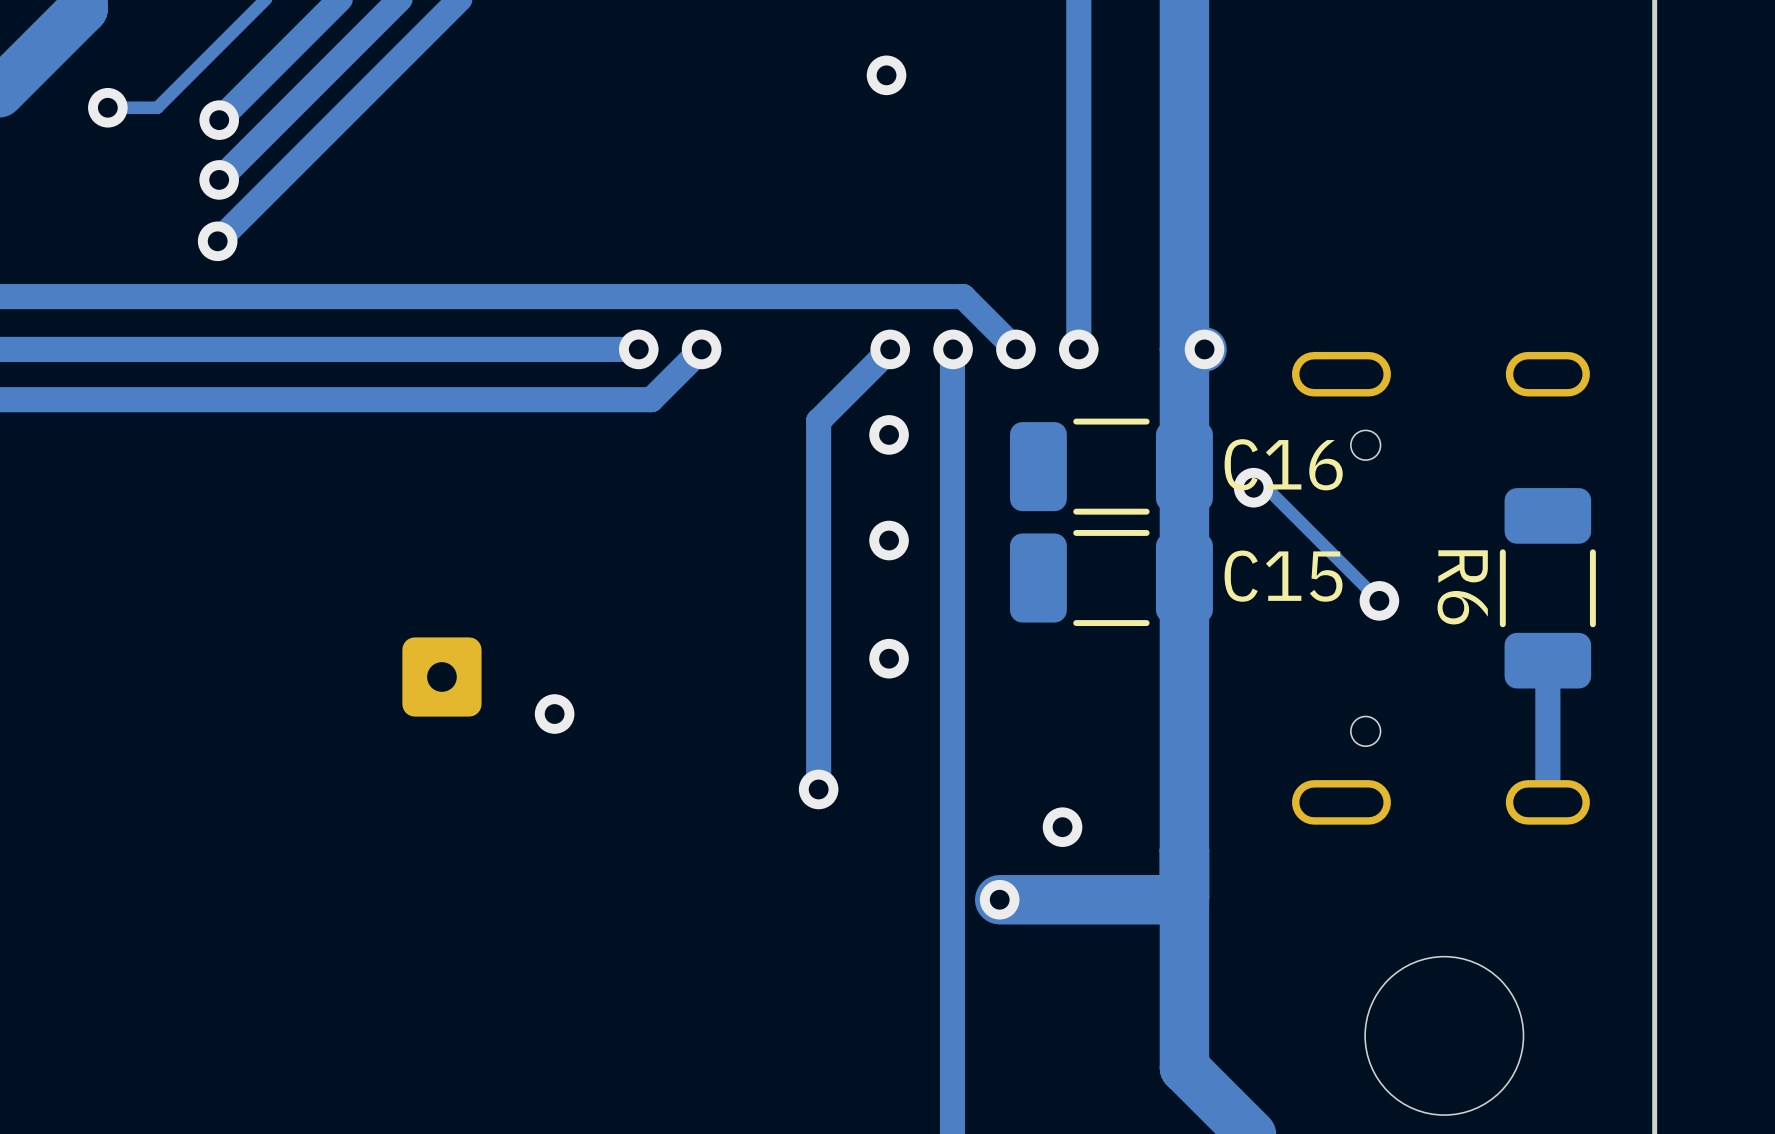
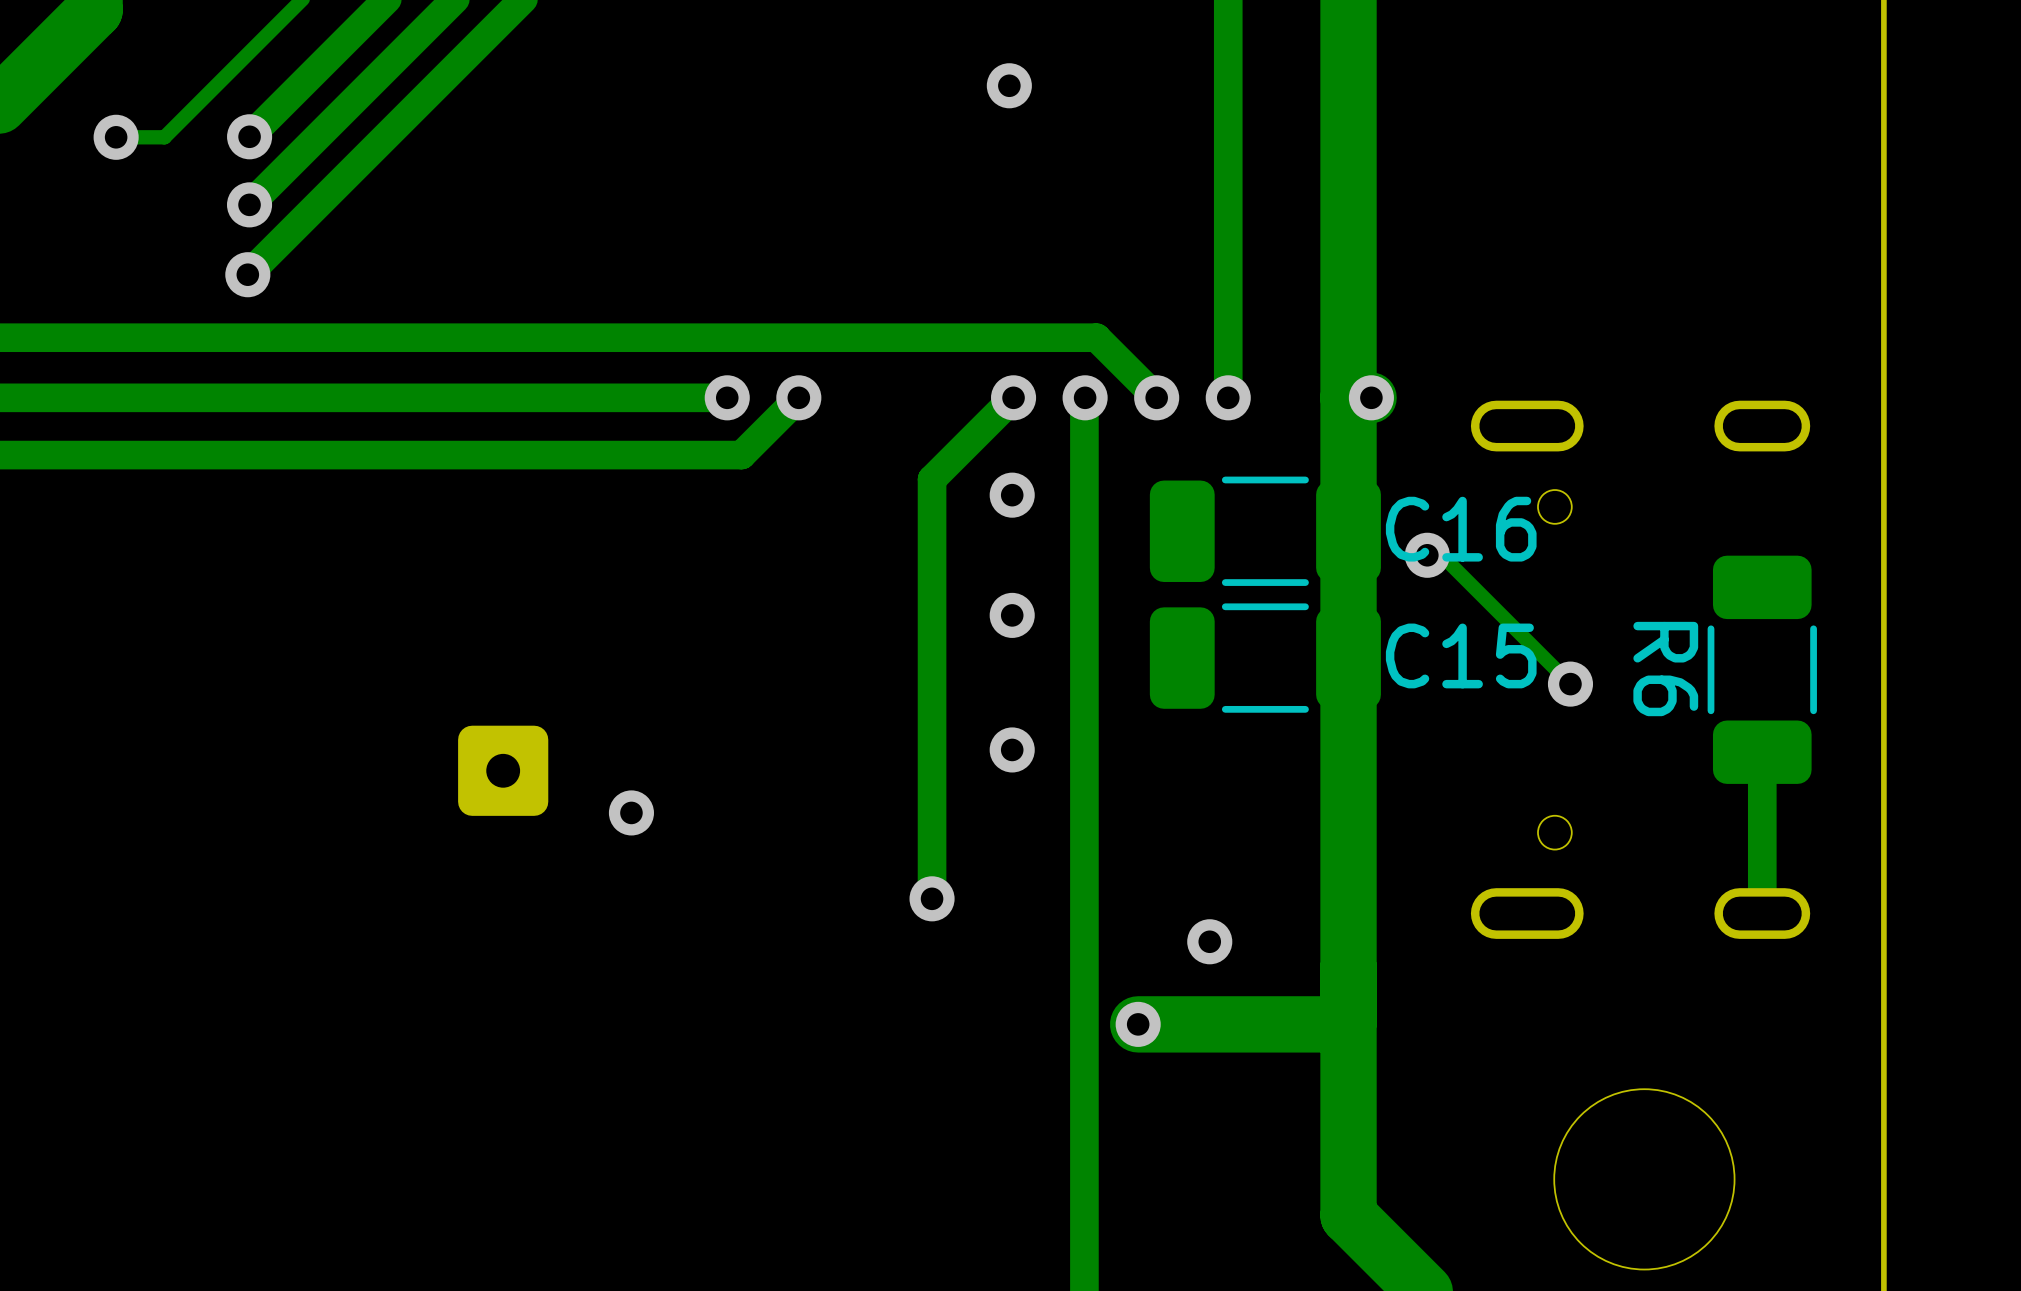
via position: (107, 107) -> (116, 137)
track: (157, 107) (107, 107) -> (179, 122) (164, 137) (116, 137)

